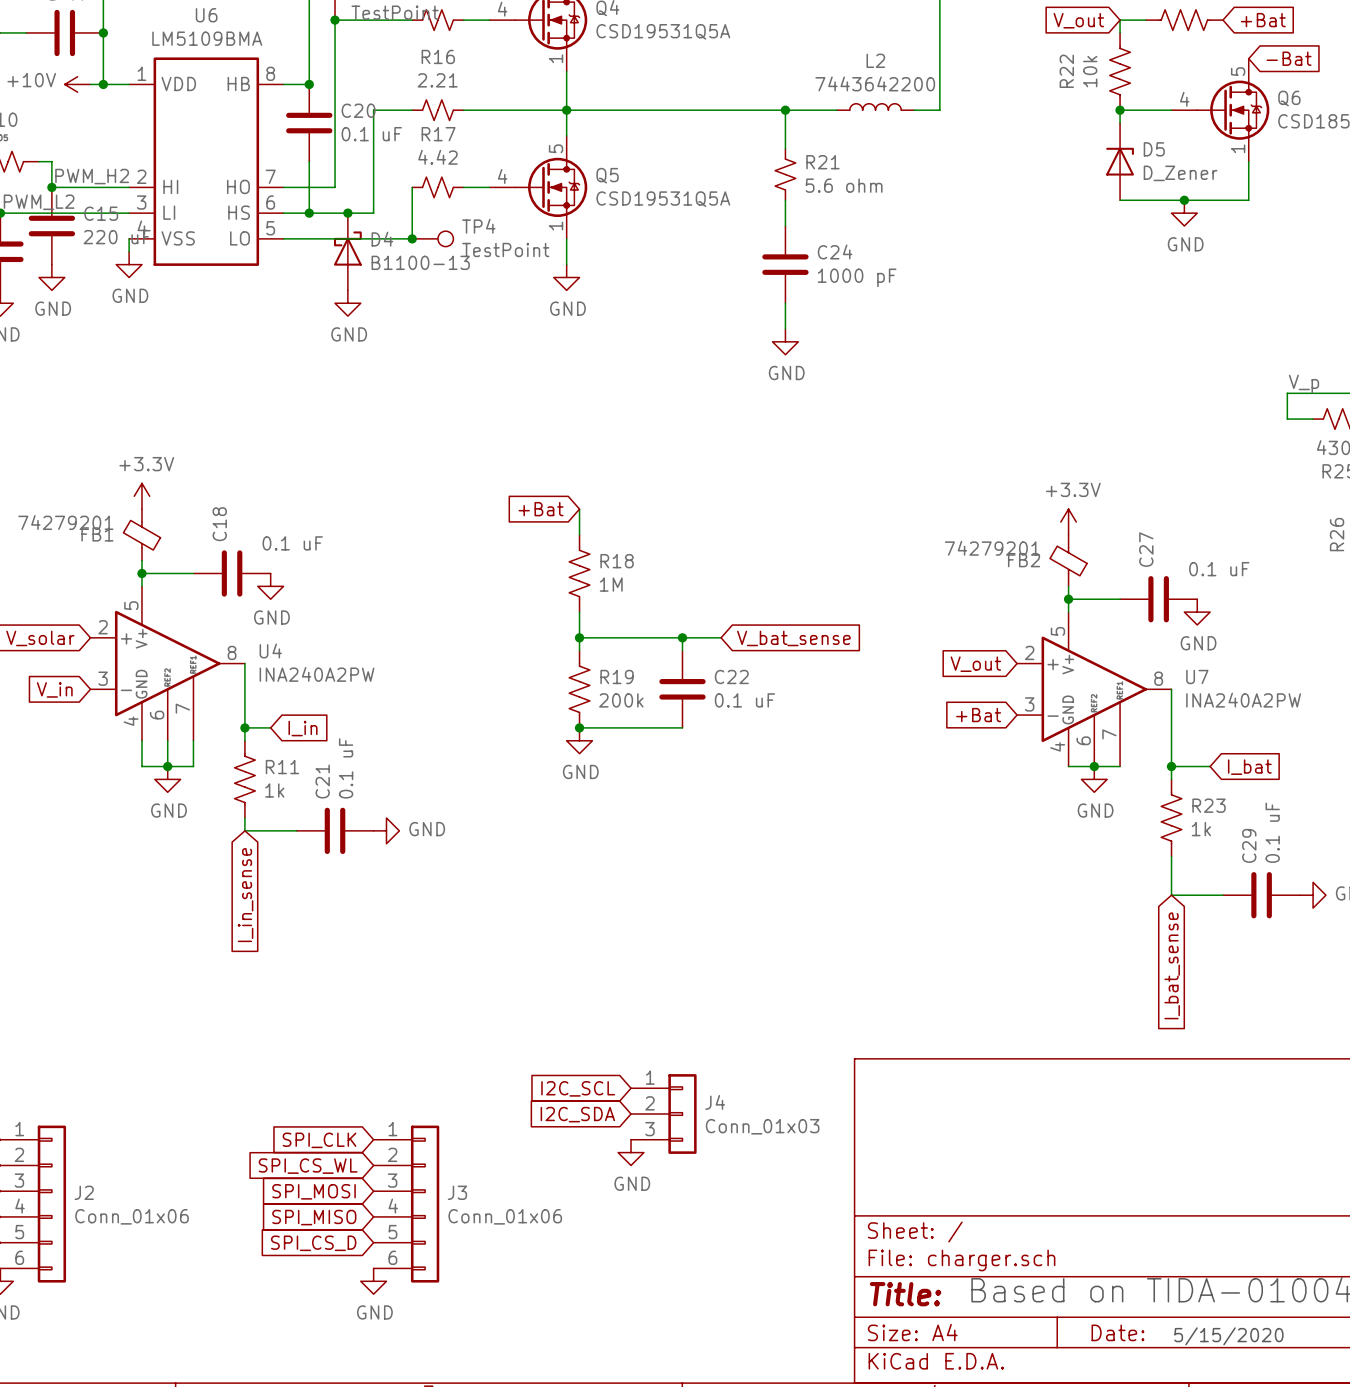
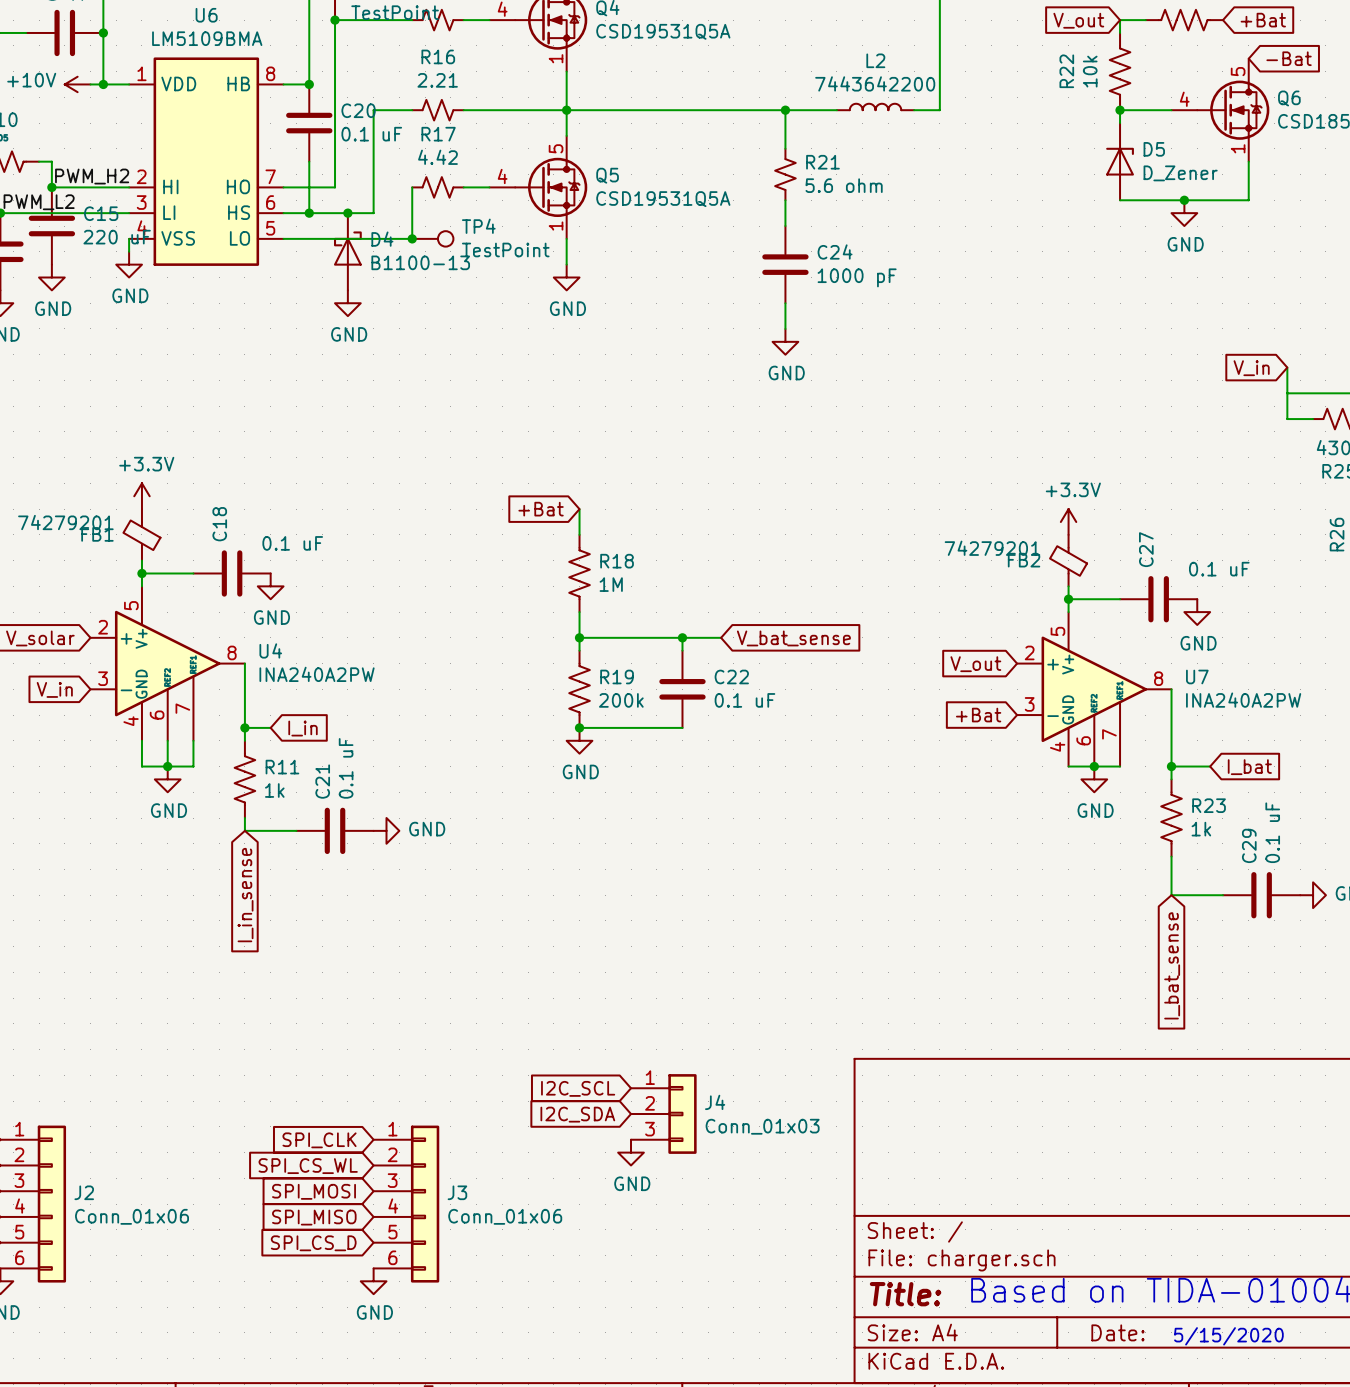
wire: none -> (1287, 367) (1287, 393)
global label: none -> V_in (1251, 368)
label: V_p (1303, 383) -> none

